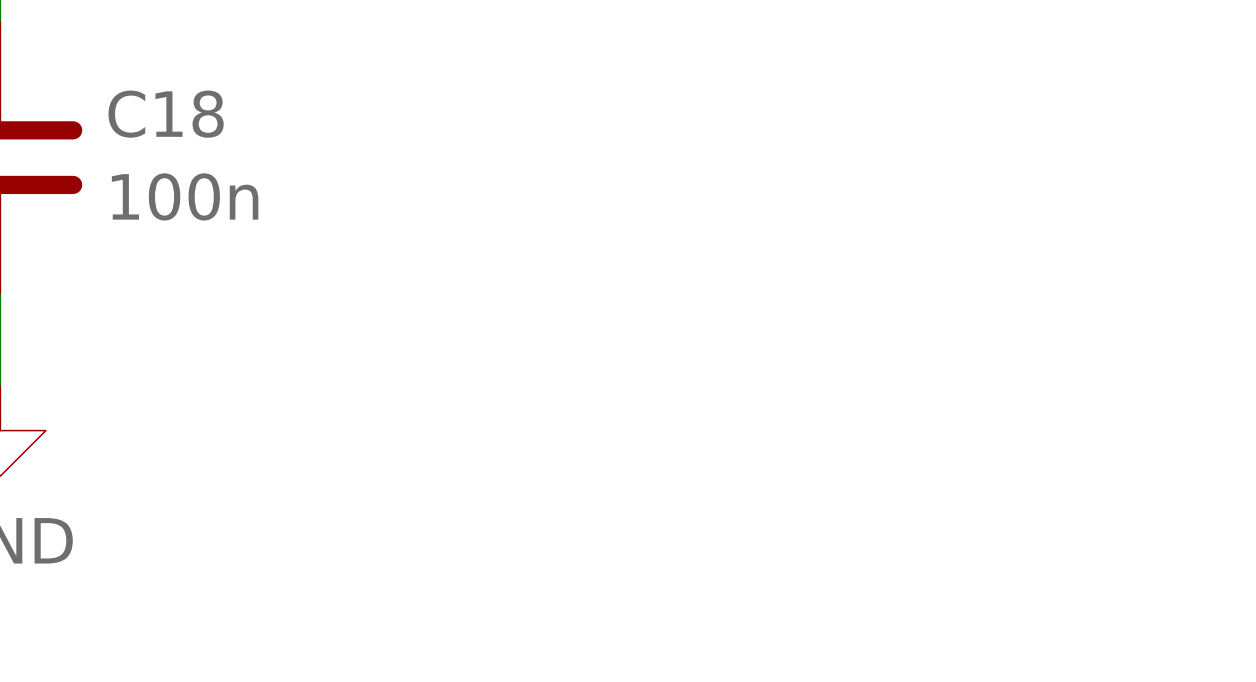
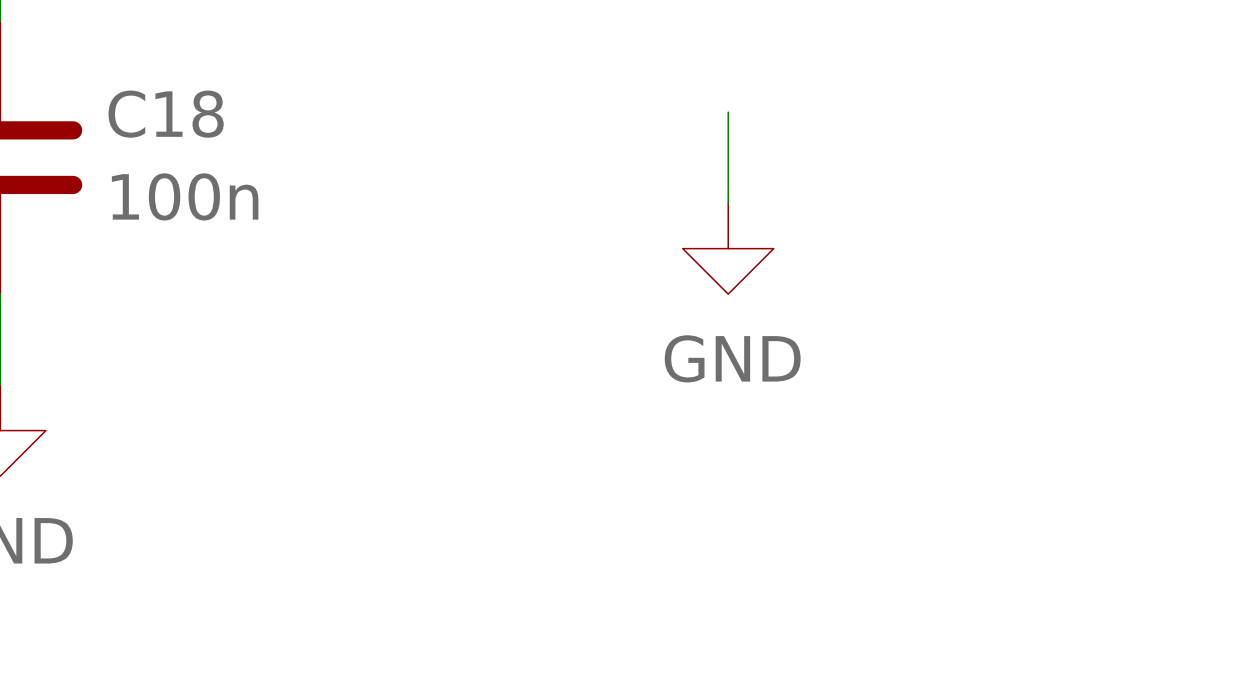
wire: none -> (728, 112) (728, 203)
power symbol: none -> GND (728, 248)

